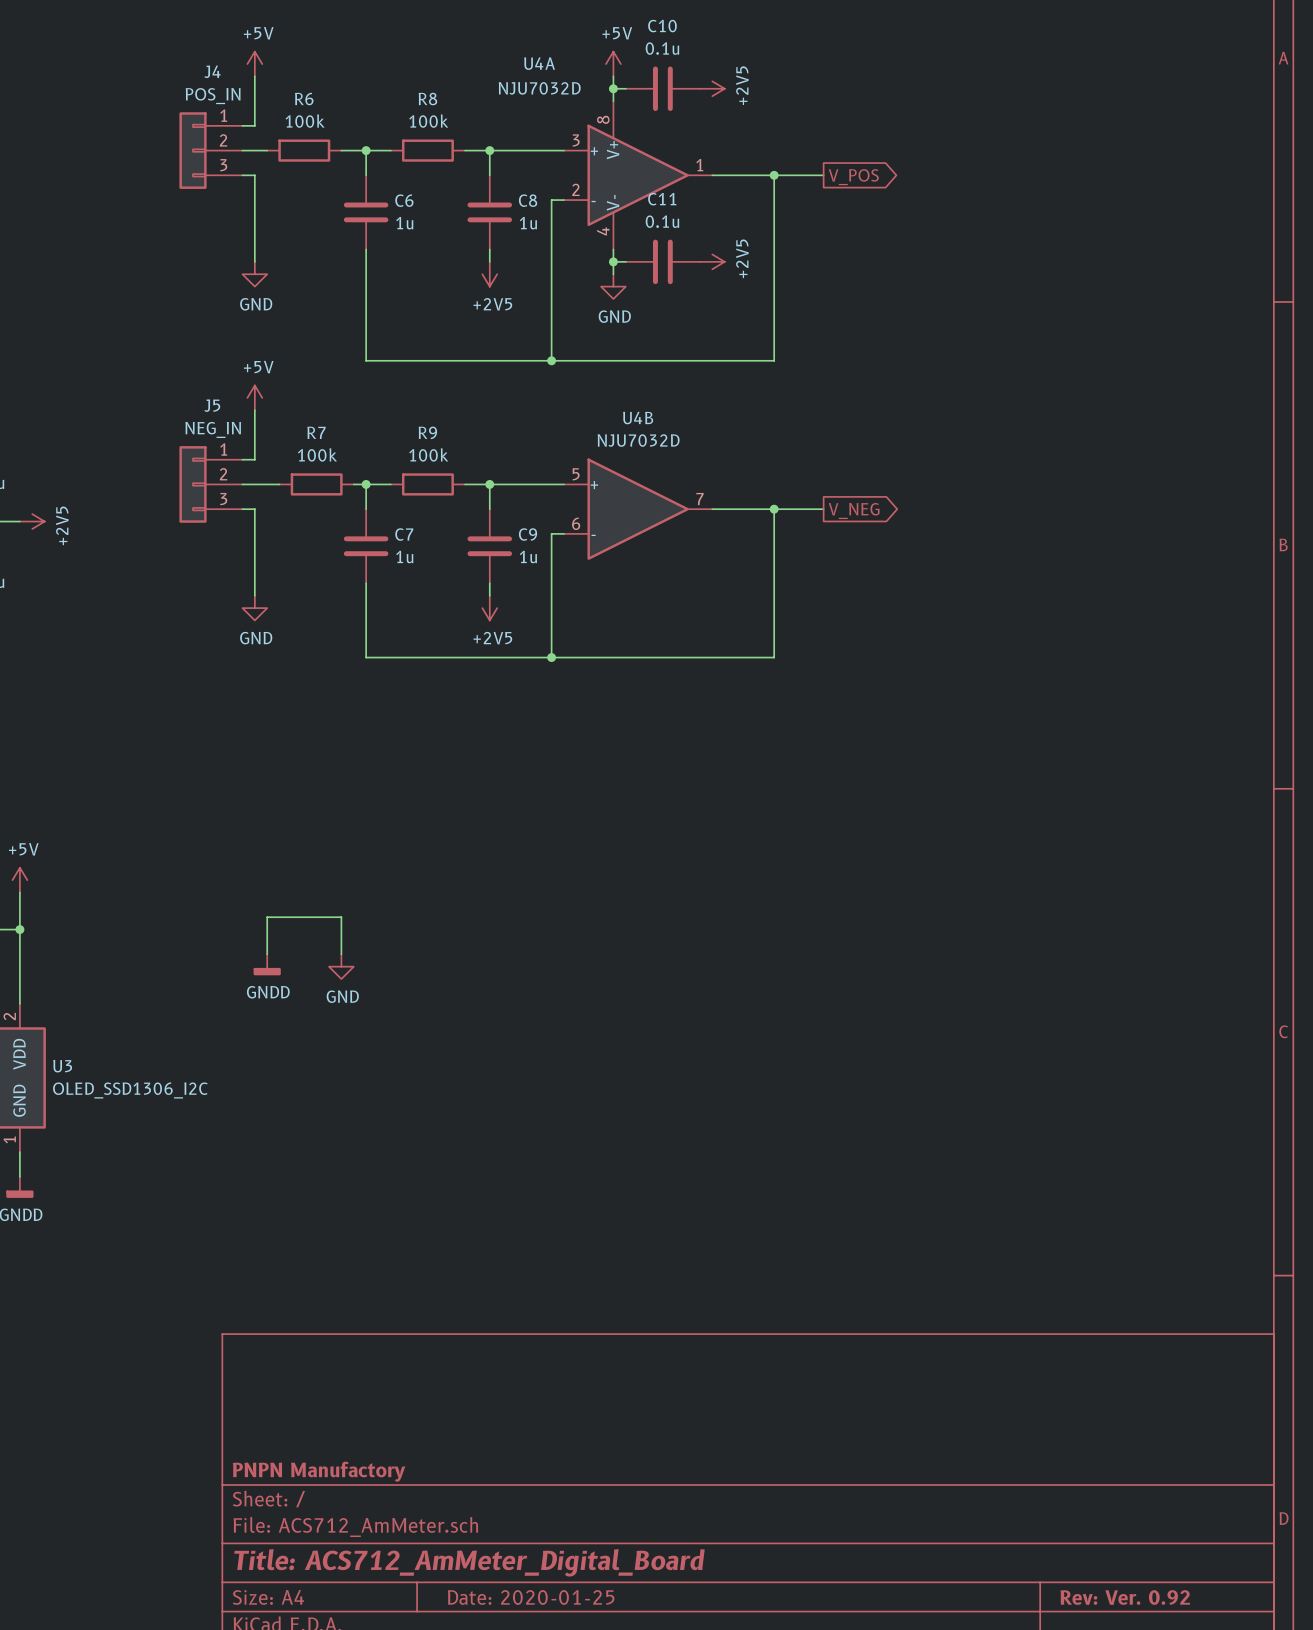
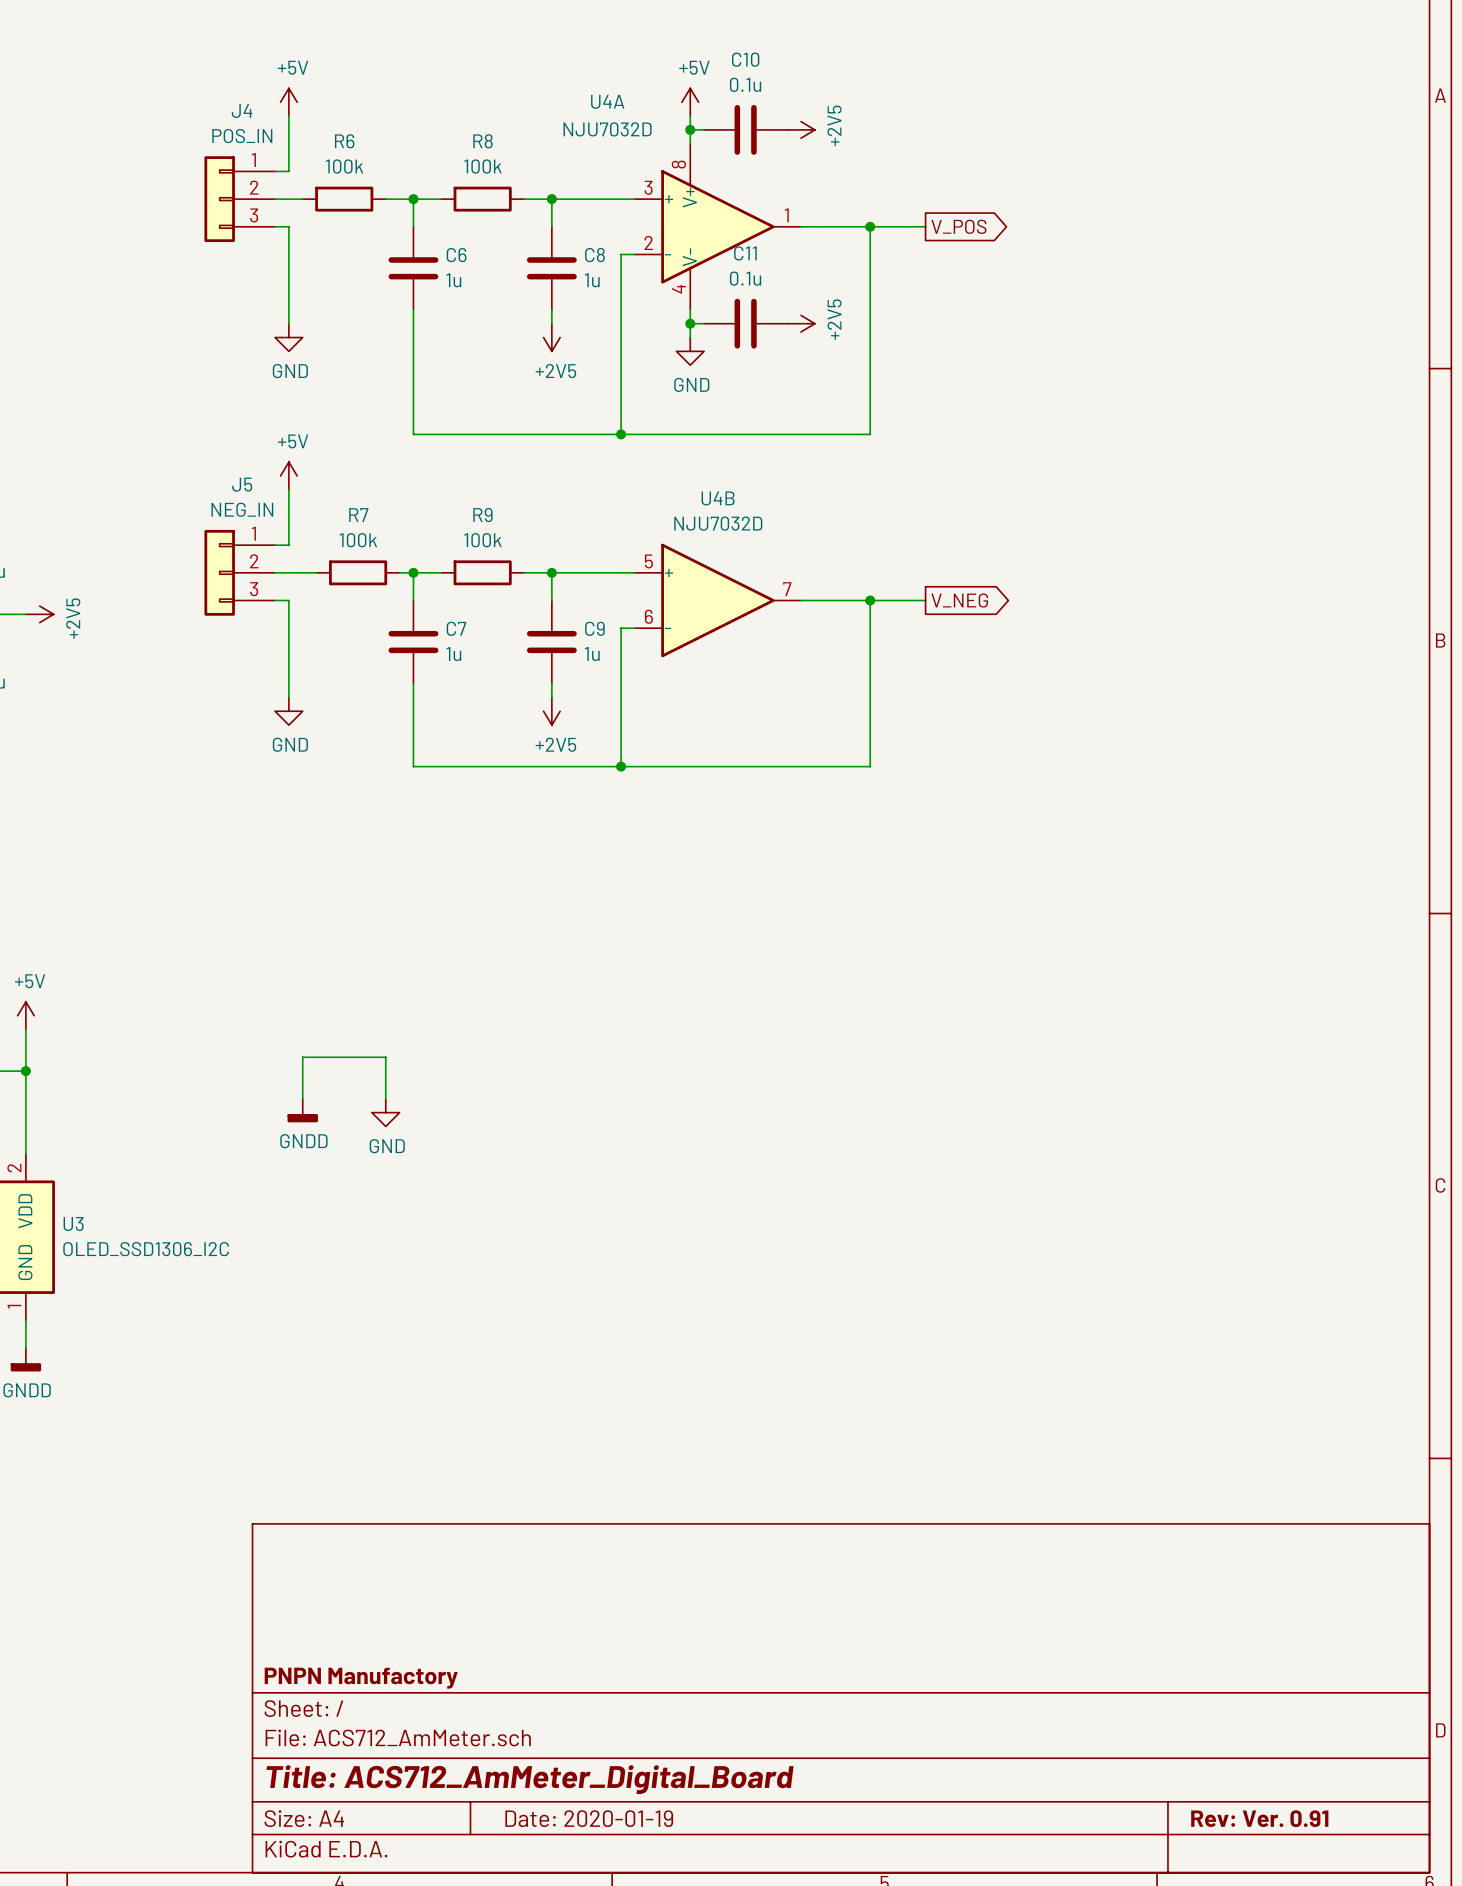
title block: Date: 2020-01-25 (531, 1597) -> Date: 2020-01-19 (589, 1818)
title block: Rev: Ver. 0.92 (1125, 1597) -> Rev: Ver. 0.91 (1259, 1818)

